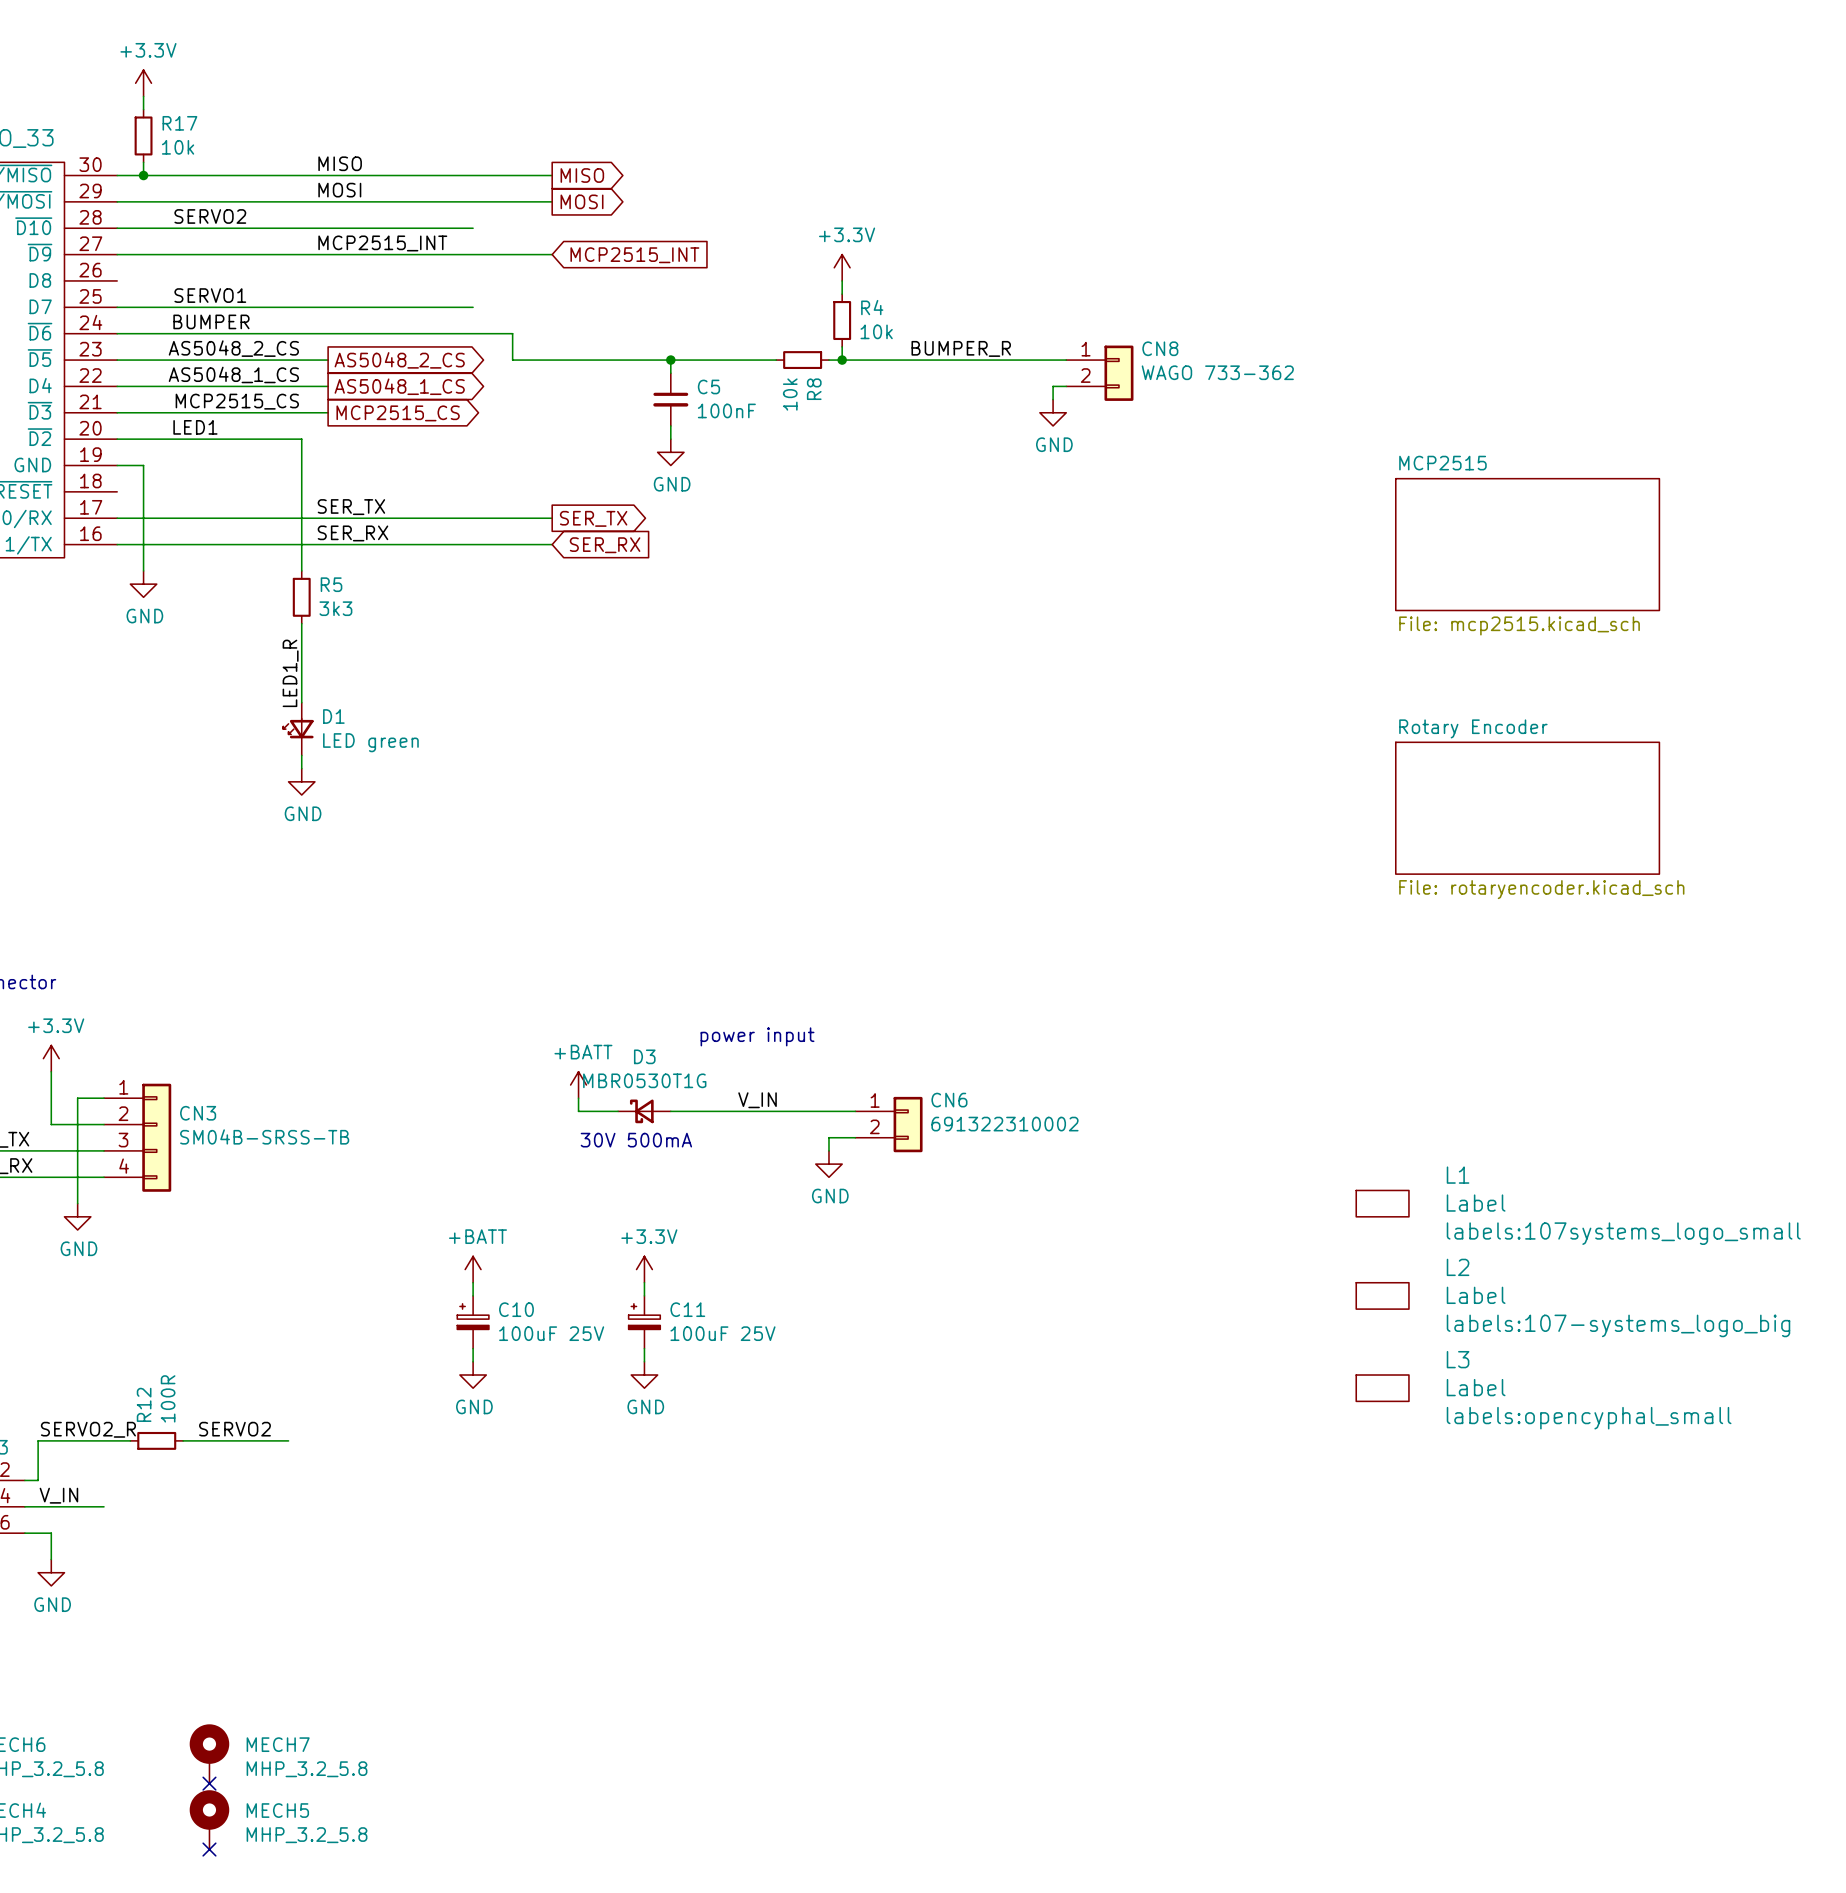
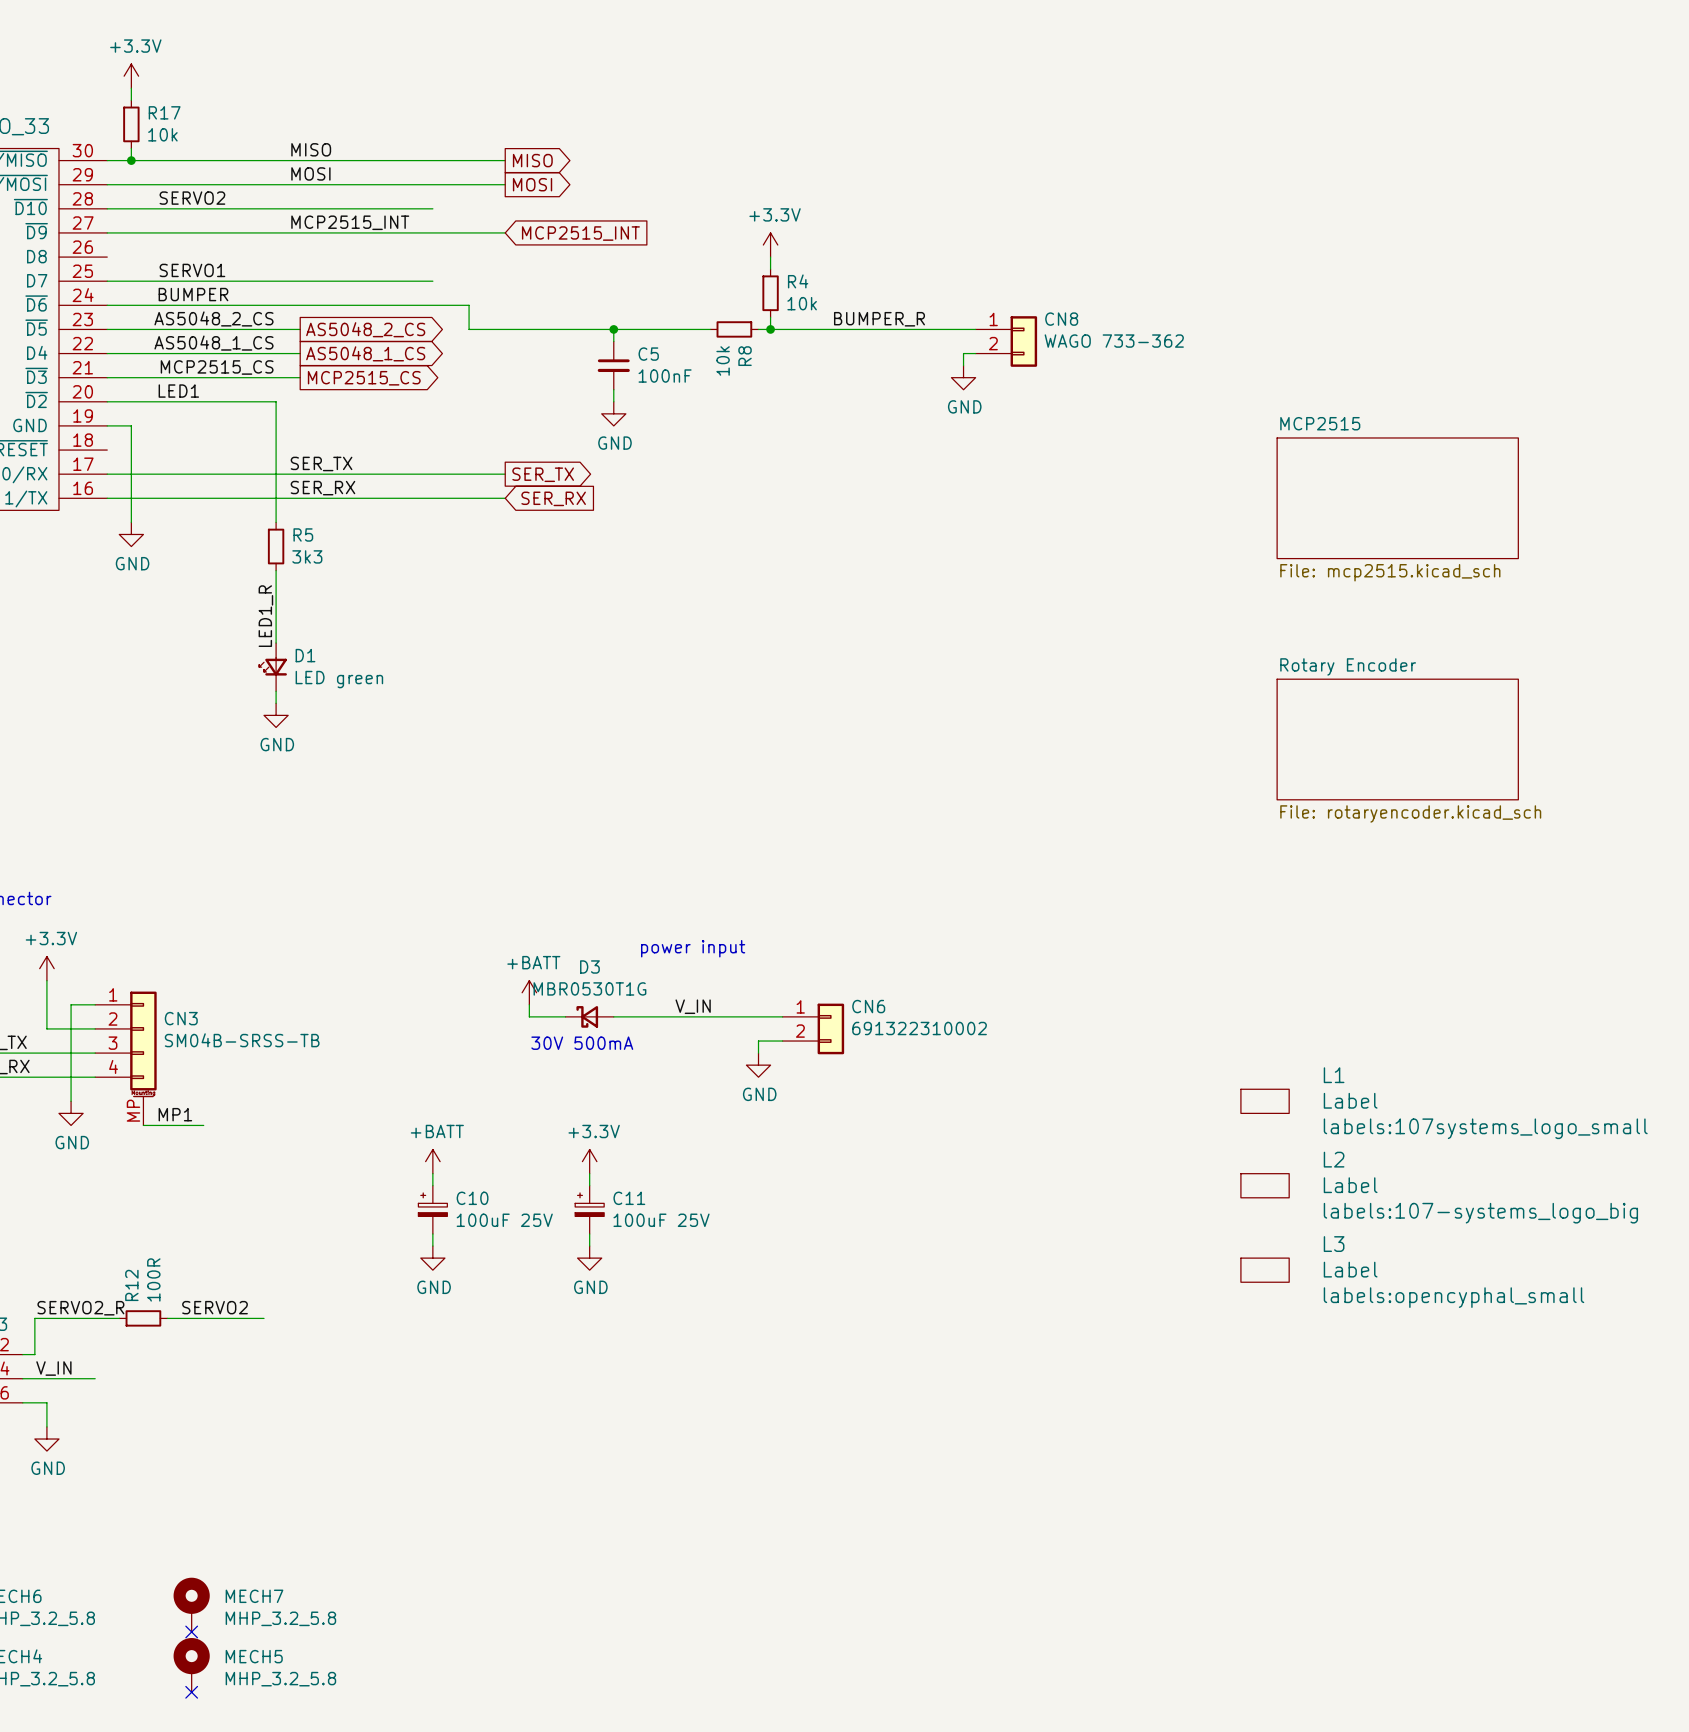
CN3 symbol: [104, 1083, 172, 1192] -> [95, 991, 157, 1126]
label: none -> MP1 (175, 1114)
wire: none -> (143, 1125) (203, 1125)

